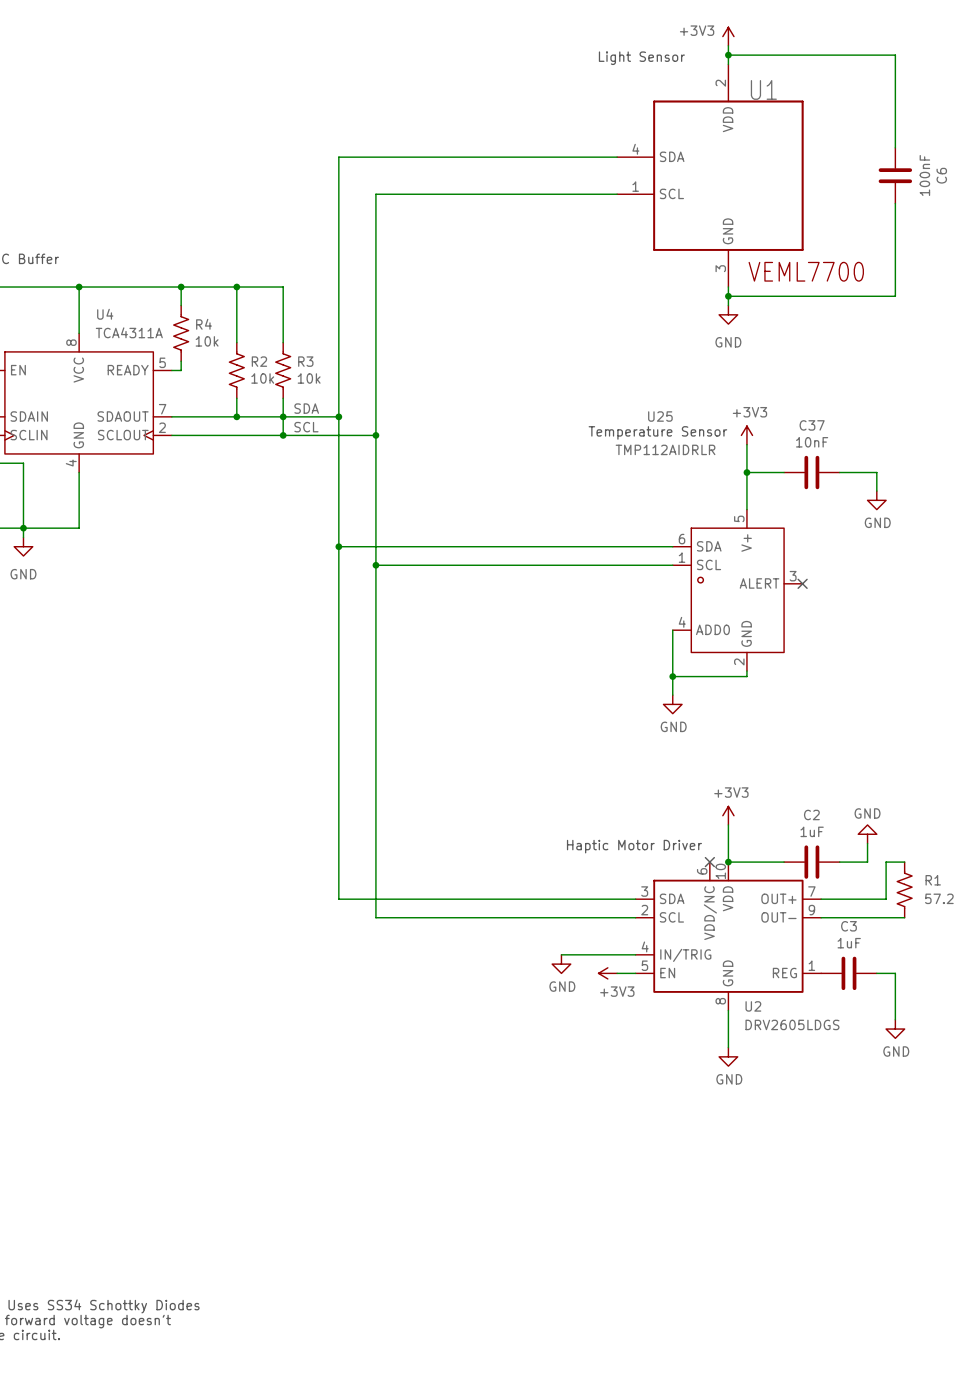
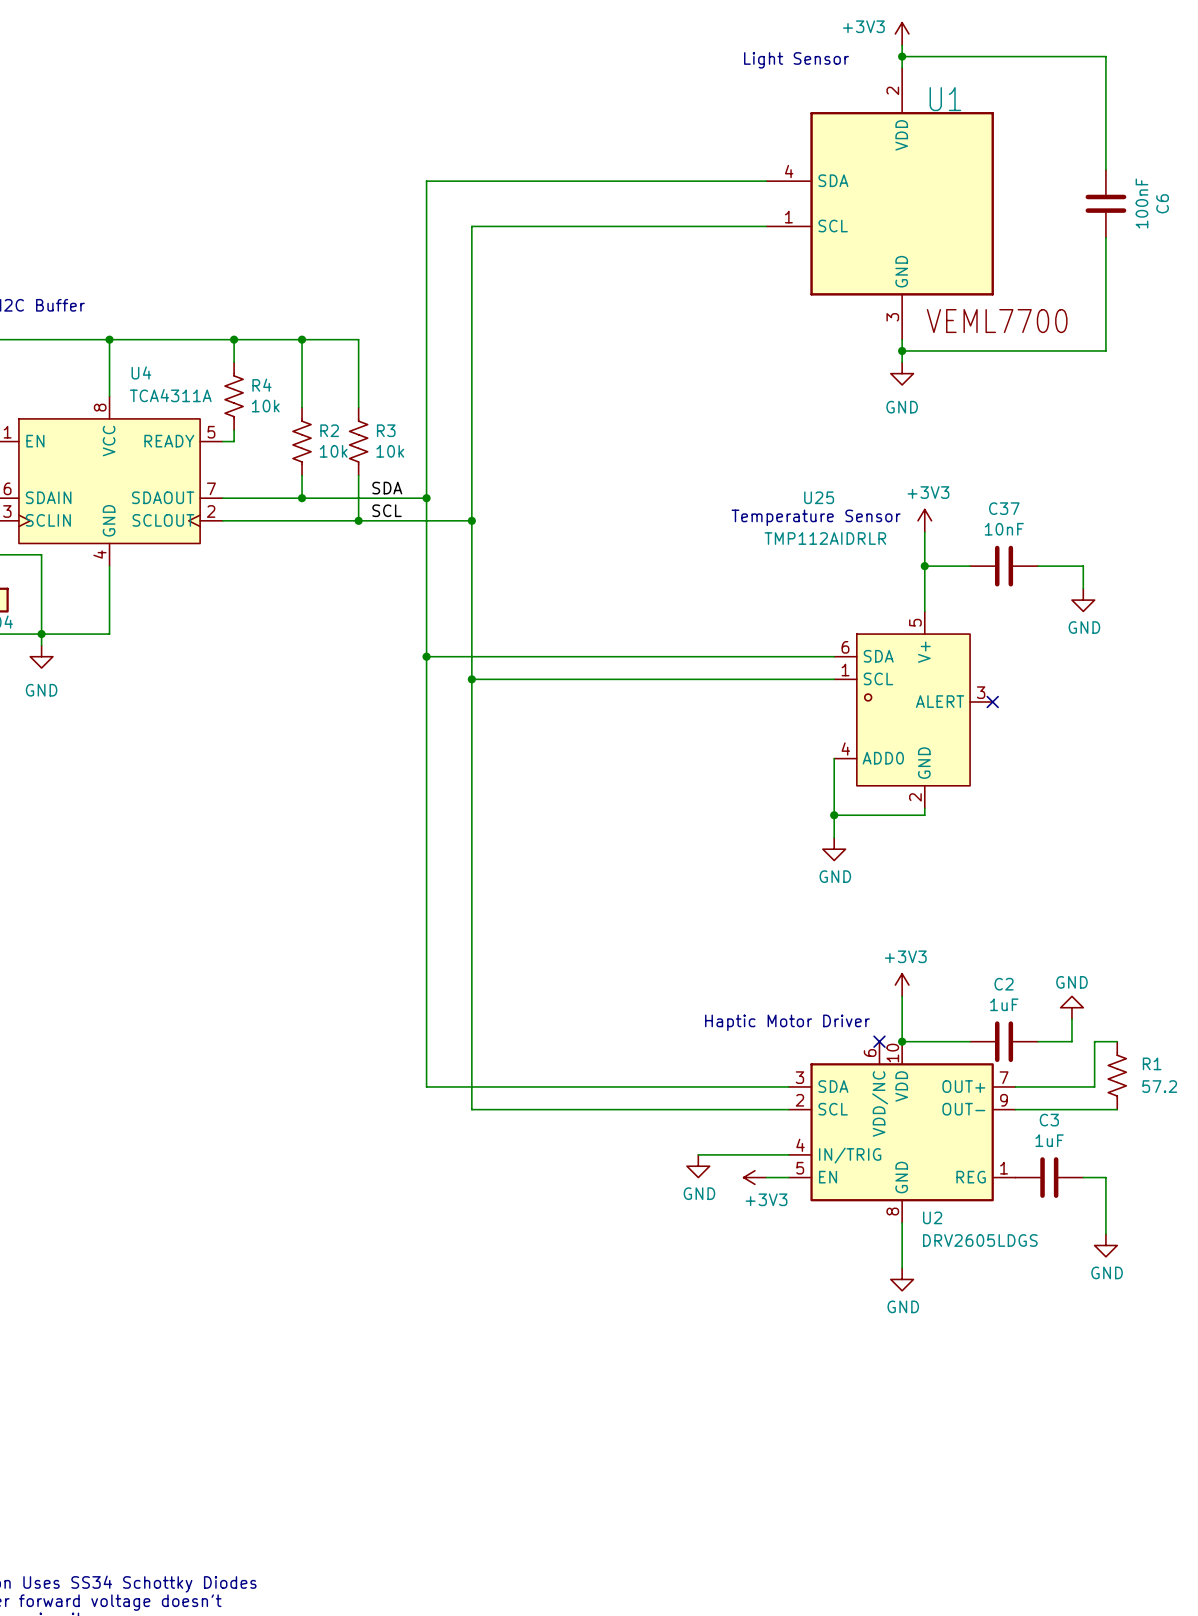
junction: (283, 416) -> none

